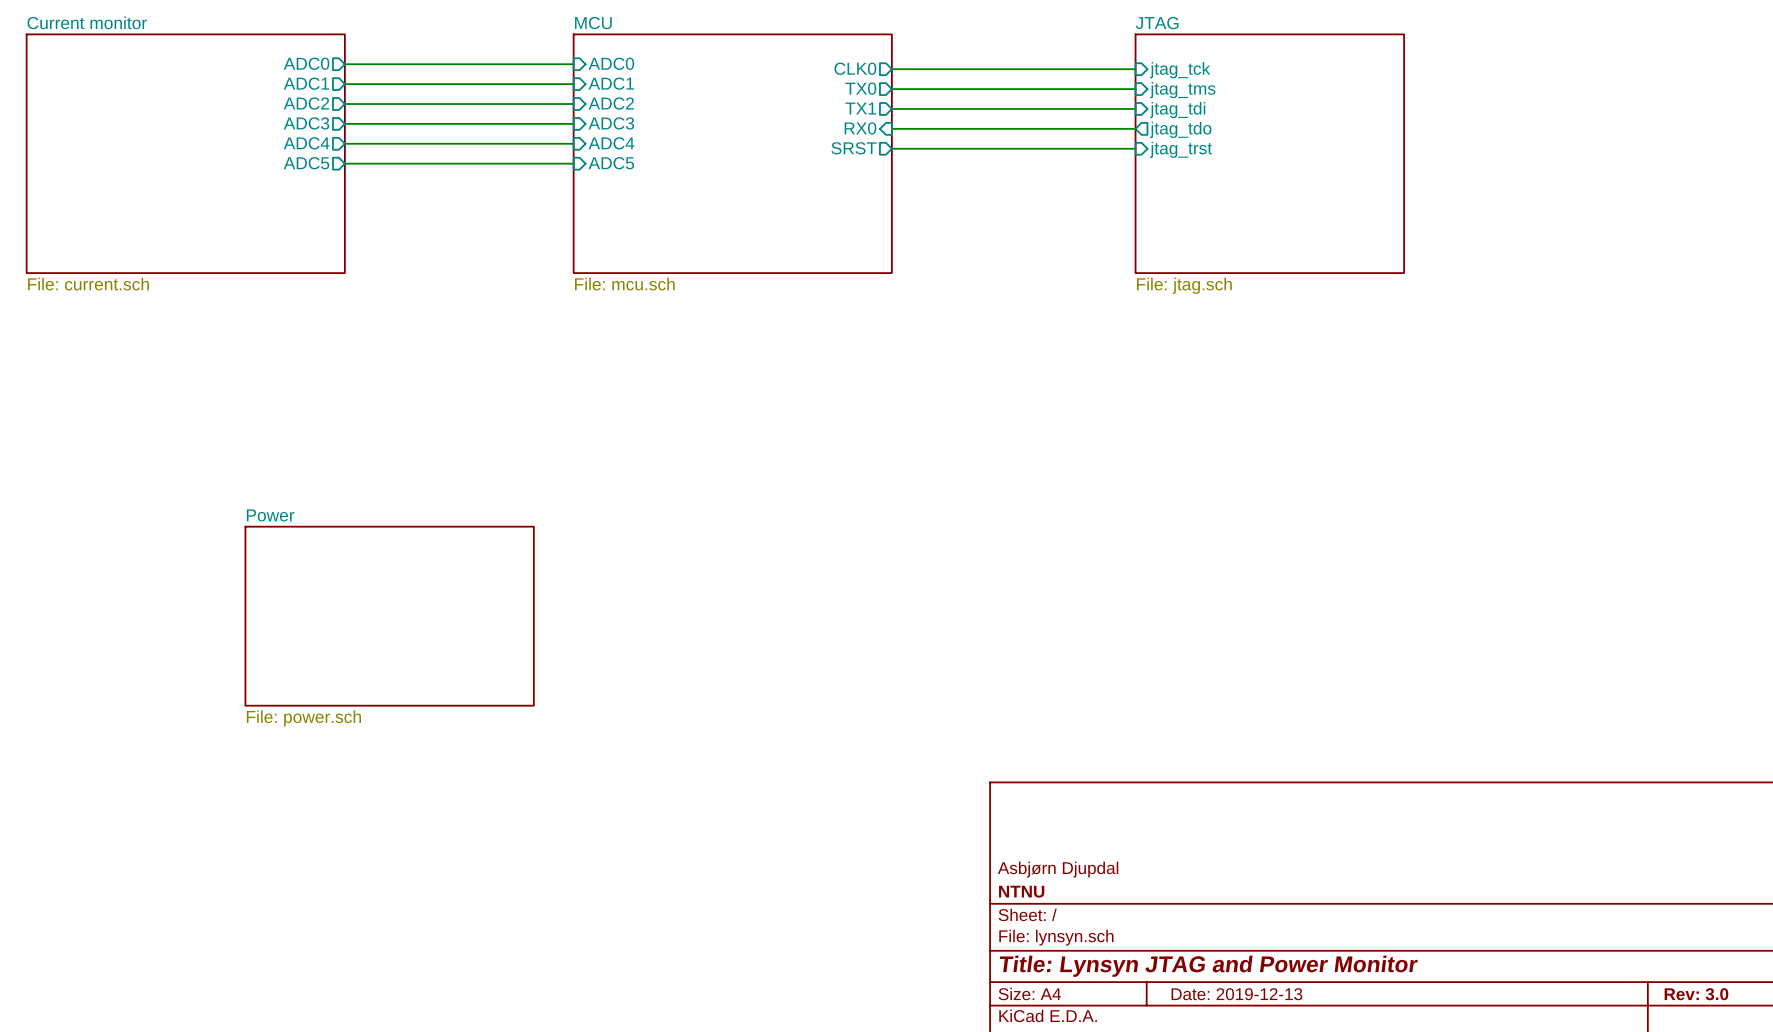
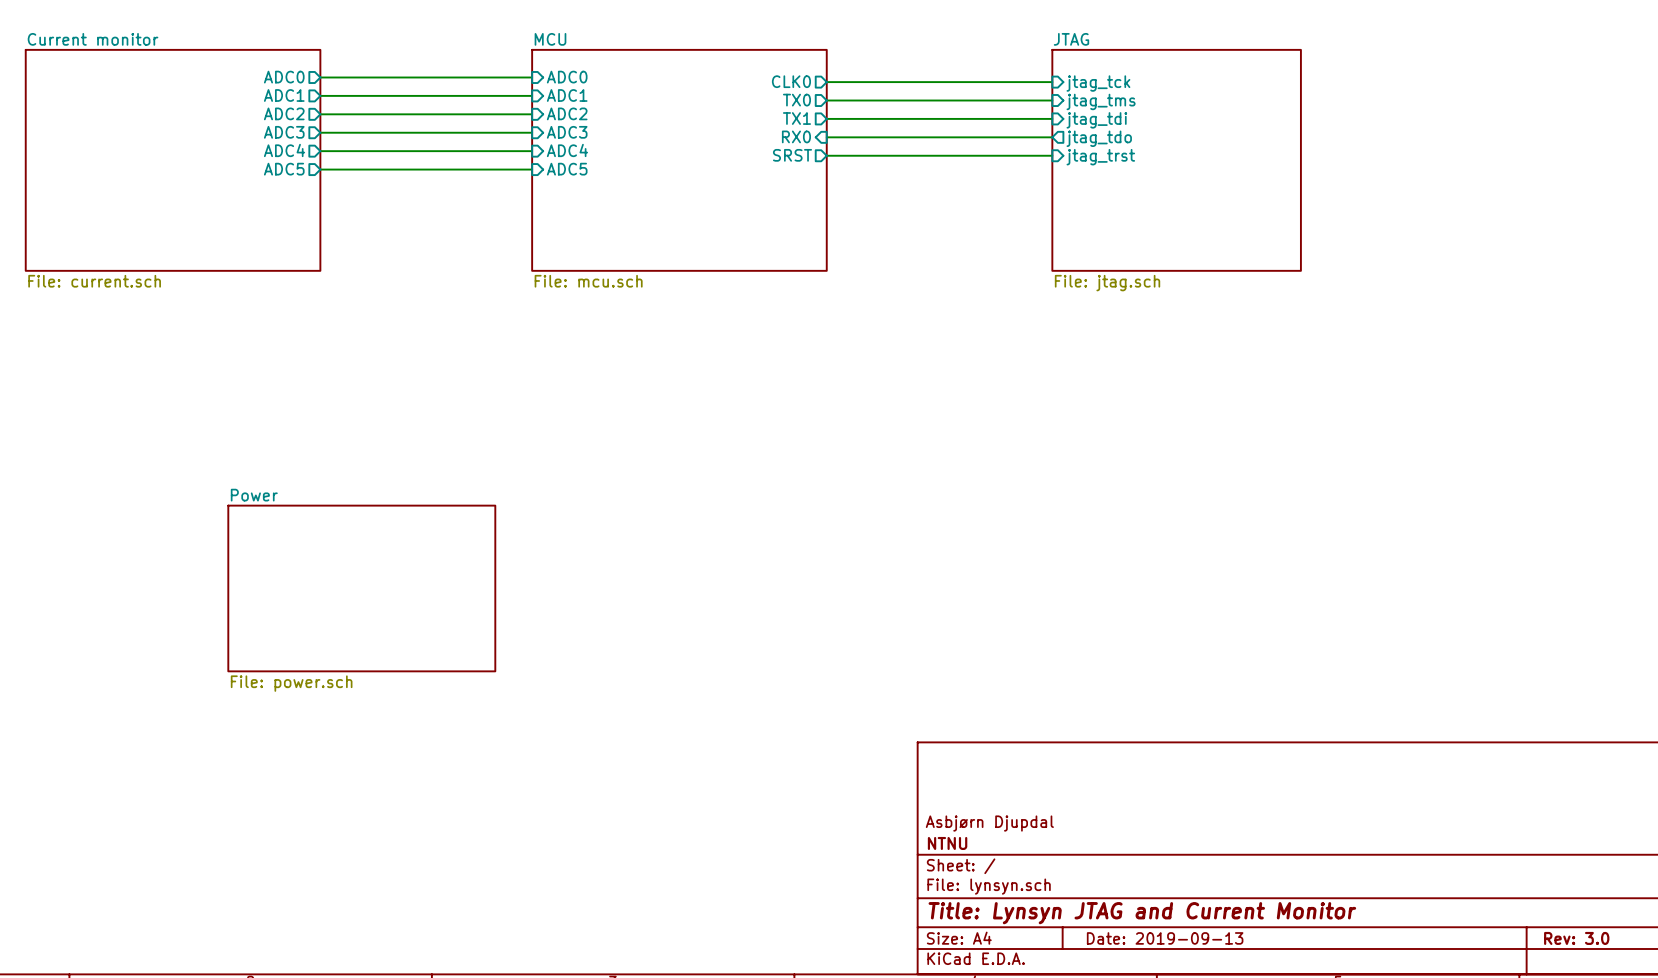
title block: Title: Lynsyn JTAG and Power Monitor (1208, 966) -> Title: Lynsyn JTAG and Current Monitor (1142, 913)
title block: Date: 2019-12-13 (1236, 994) -> Date: 2019-09-13 (1165, 938)

